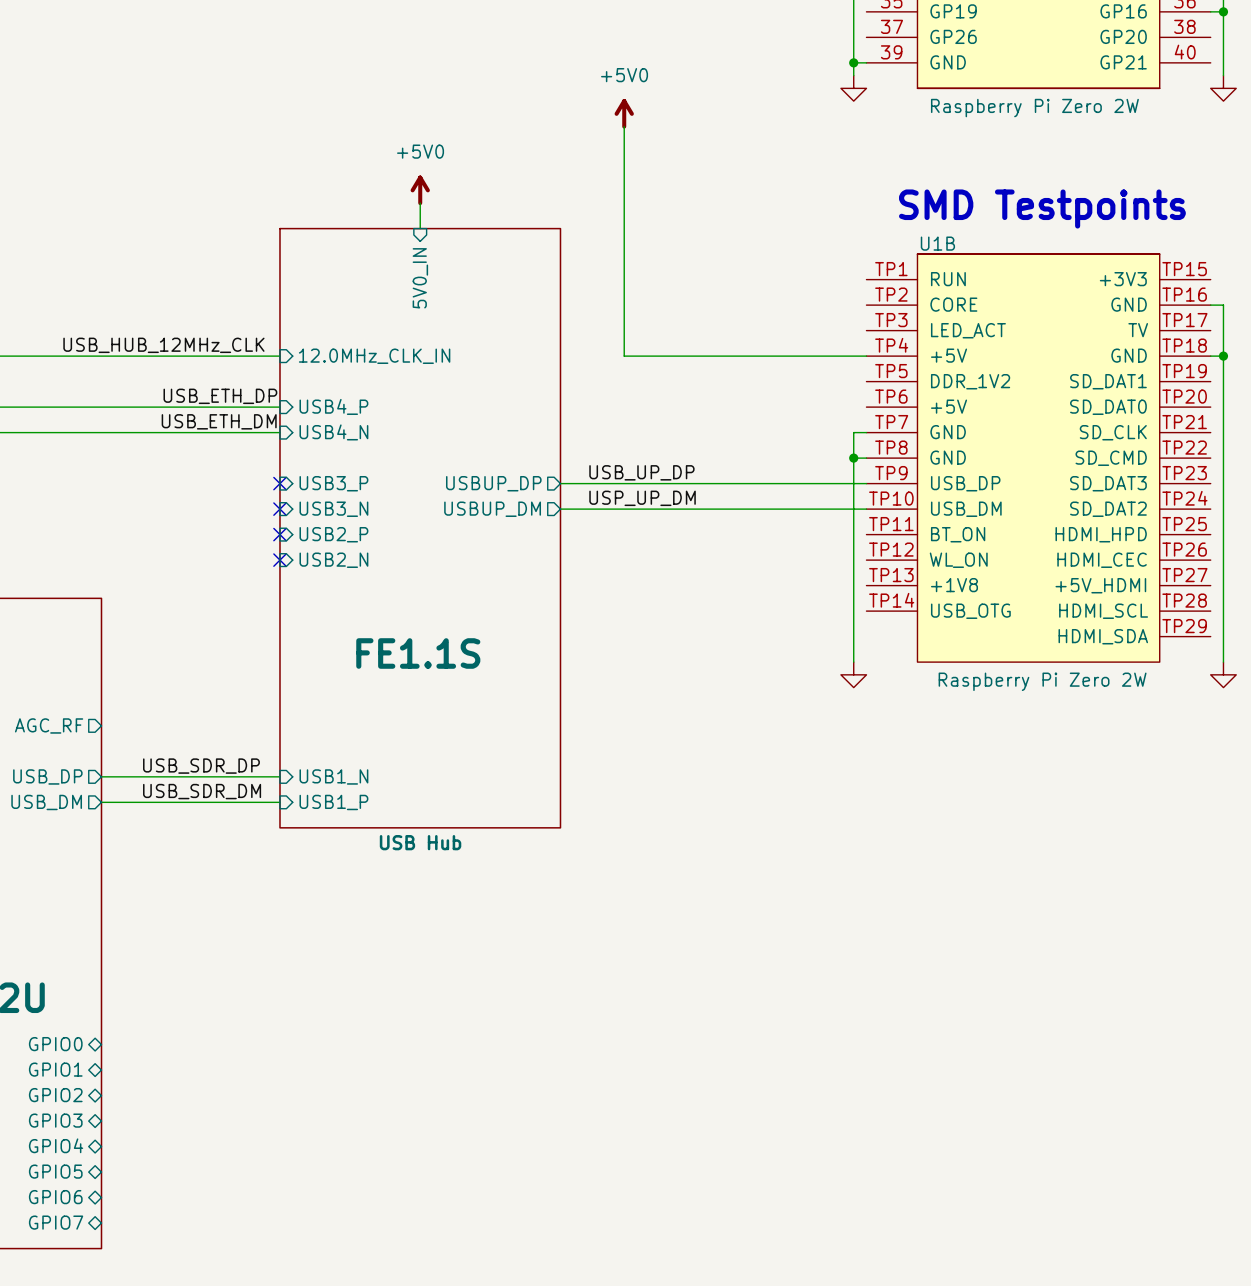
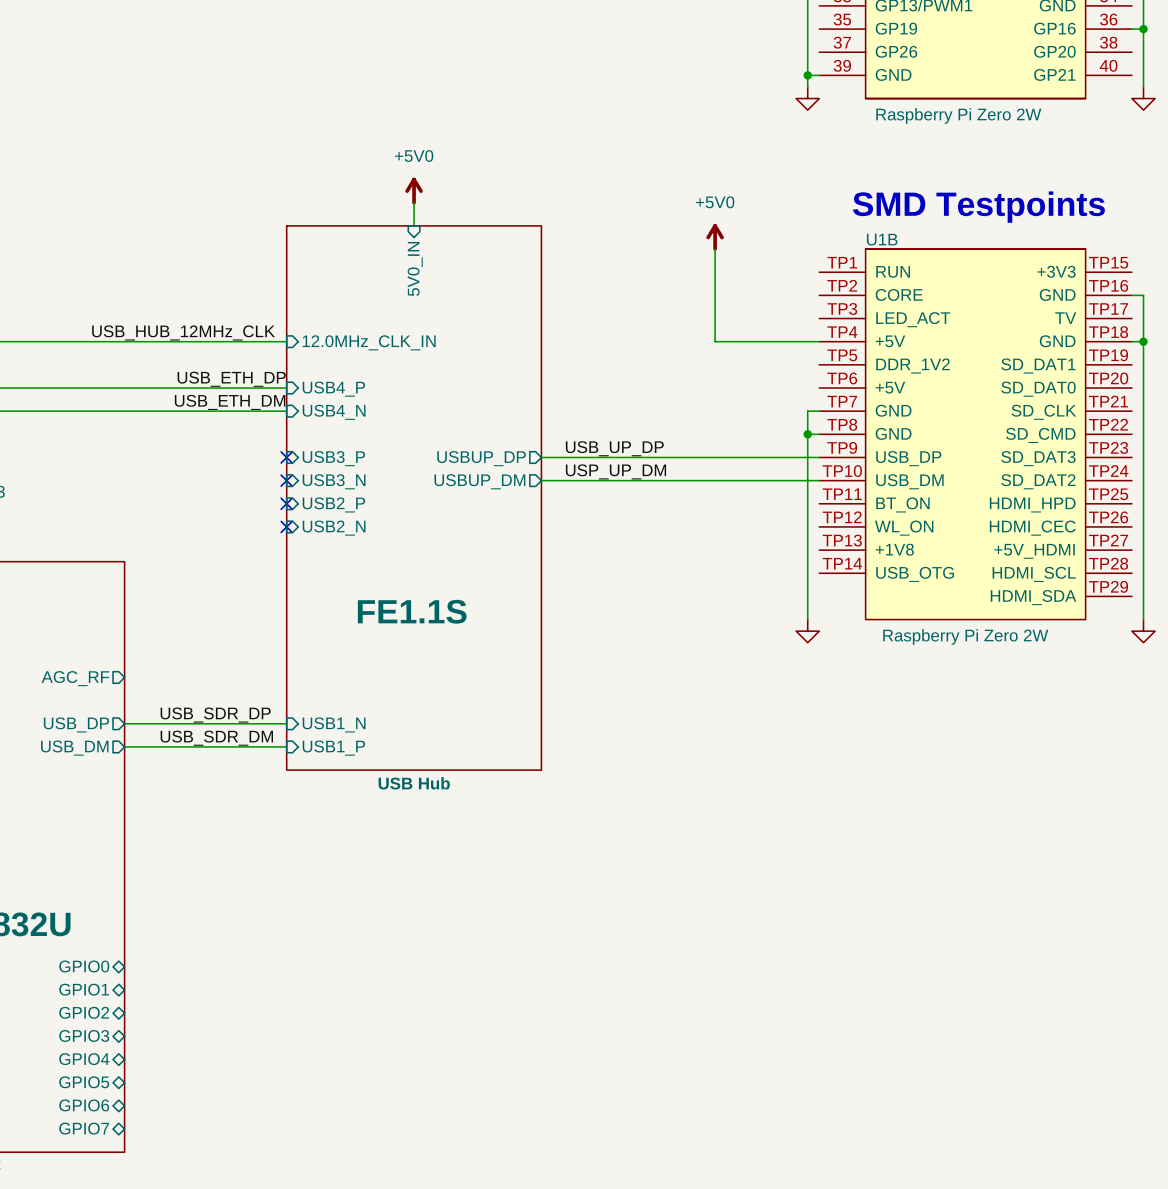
power symbol position: +5V0 (624, 113) -> +5V0 (715, 237)
wire: (624, 126) (624, 356) (751, 356) -> (715, 249) (715, 341)

